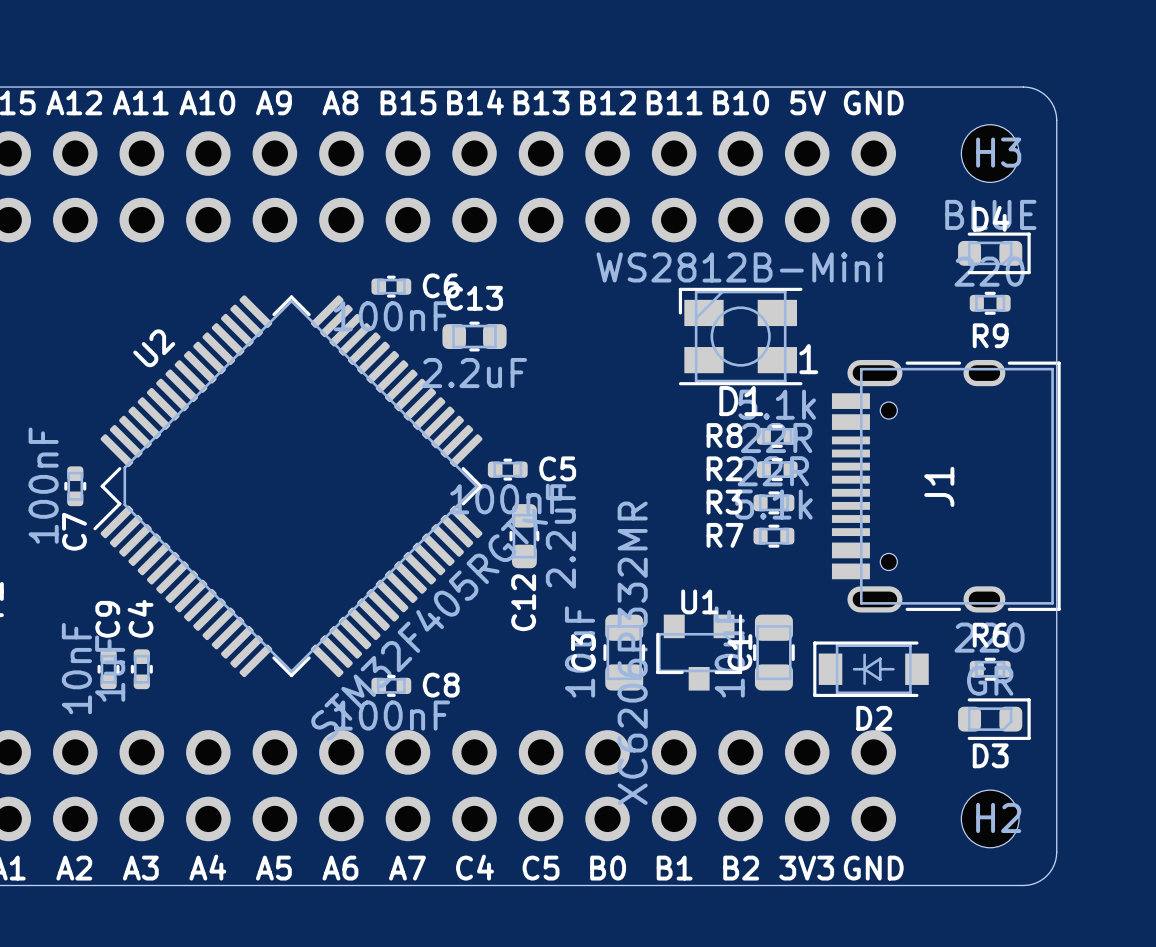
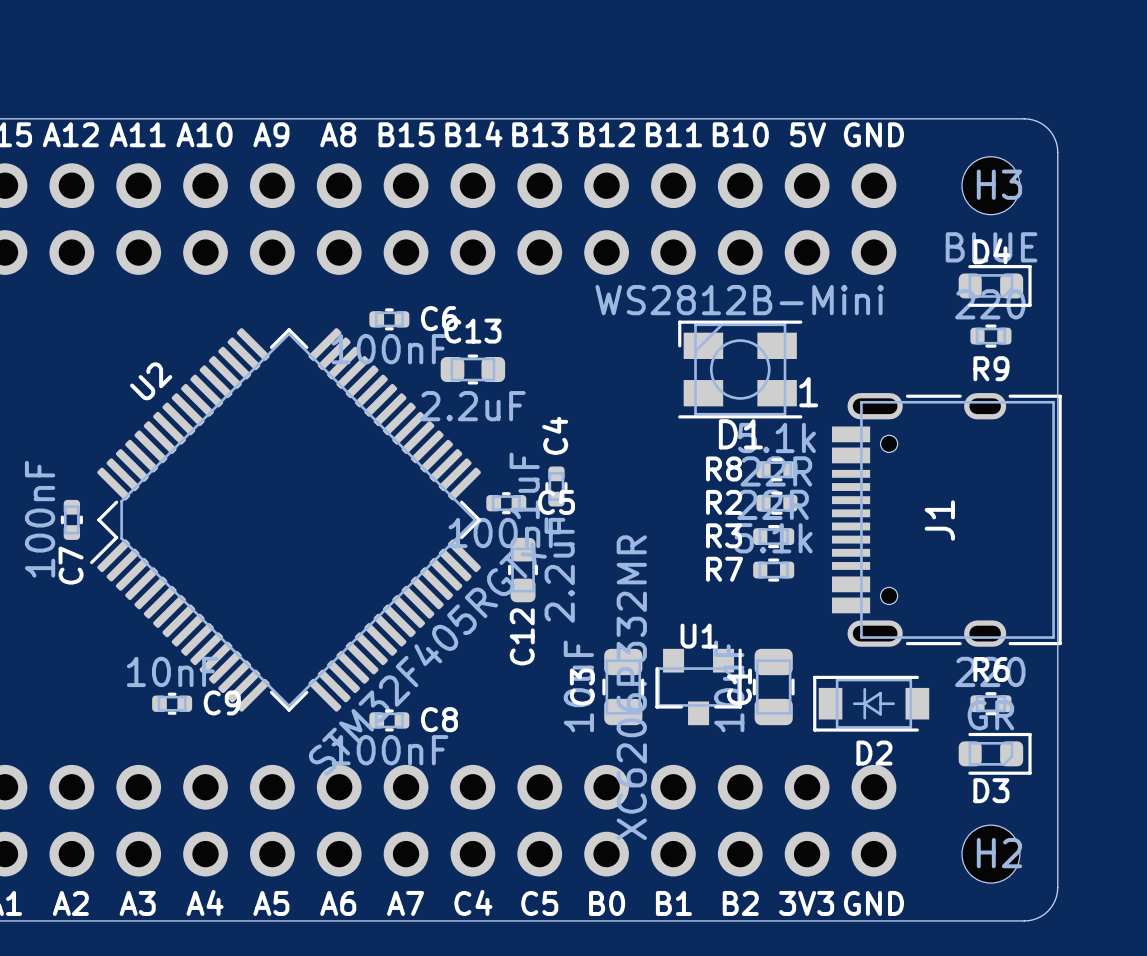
C9 rotation: 0° (108, 669) -> 90° clockwise (172, 703)
C9 position: (108, 669) -> (172, 703)
C4 position: (141, 669) -> (556, 486)

